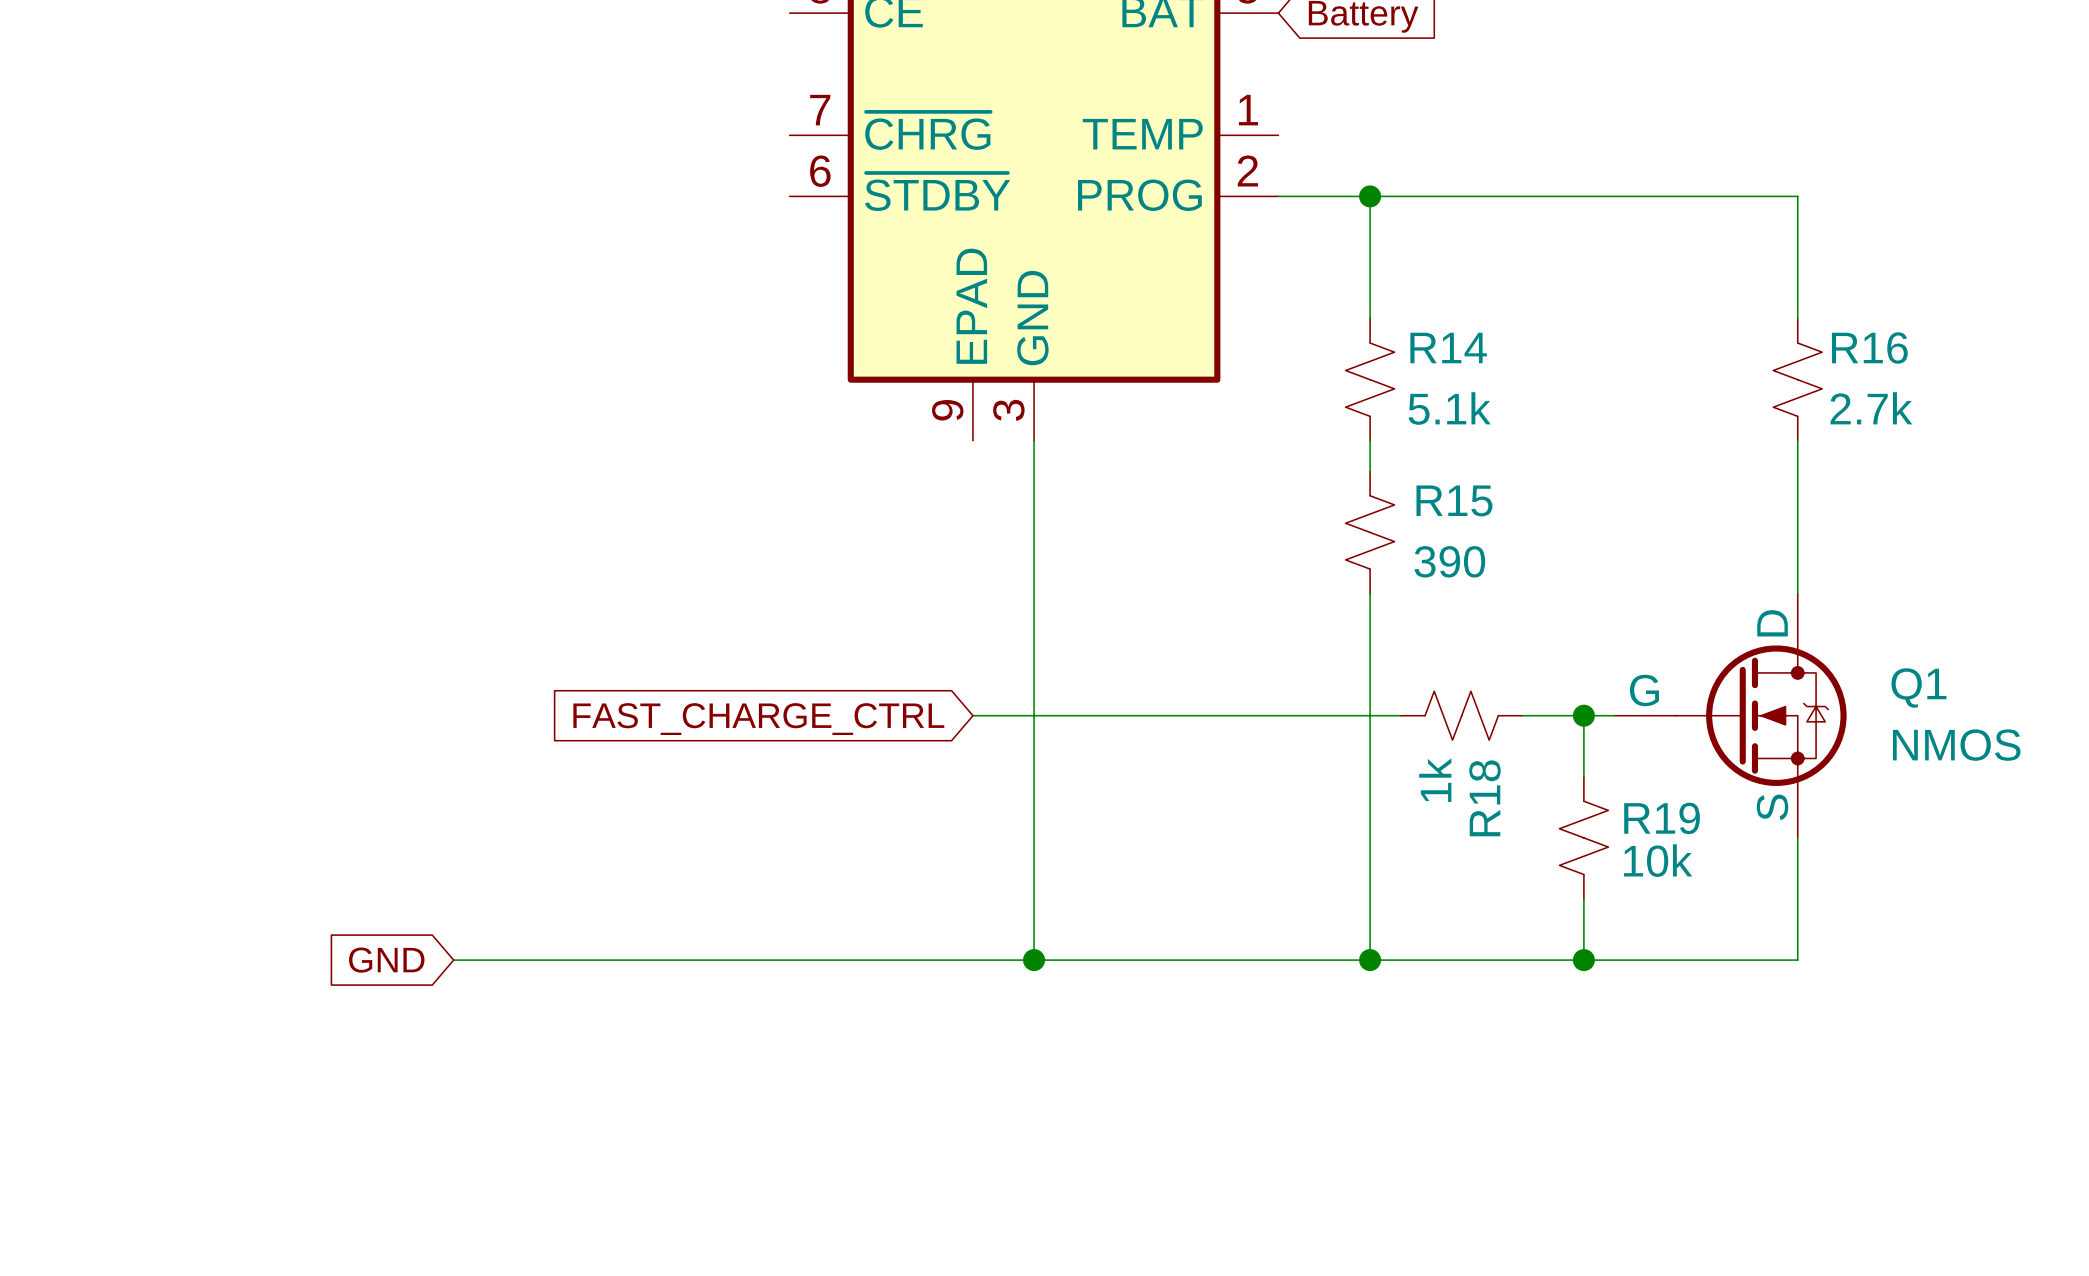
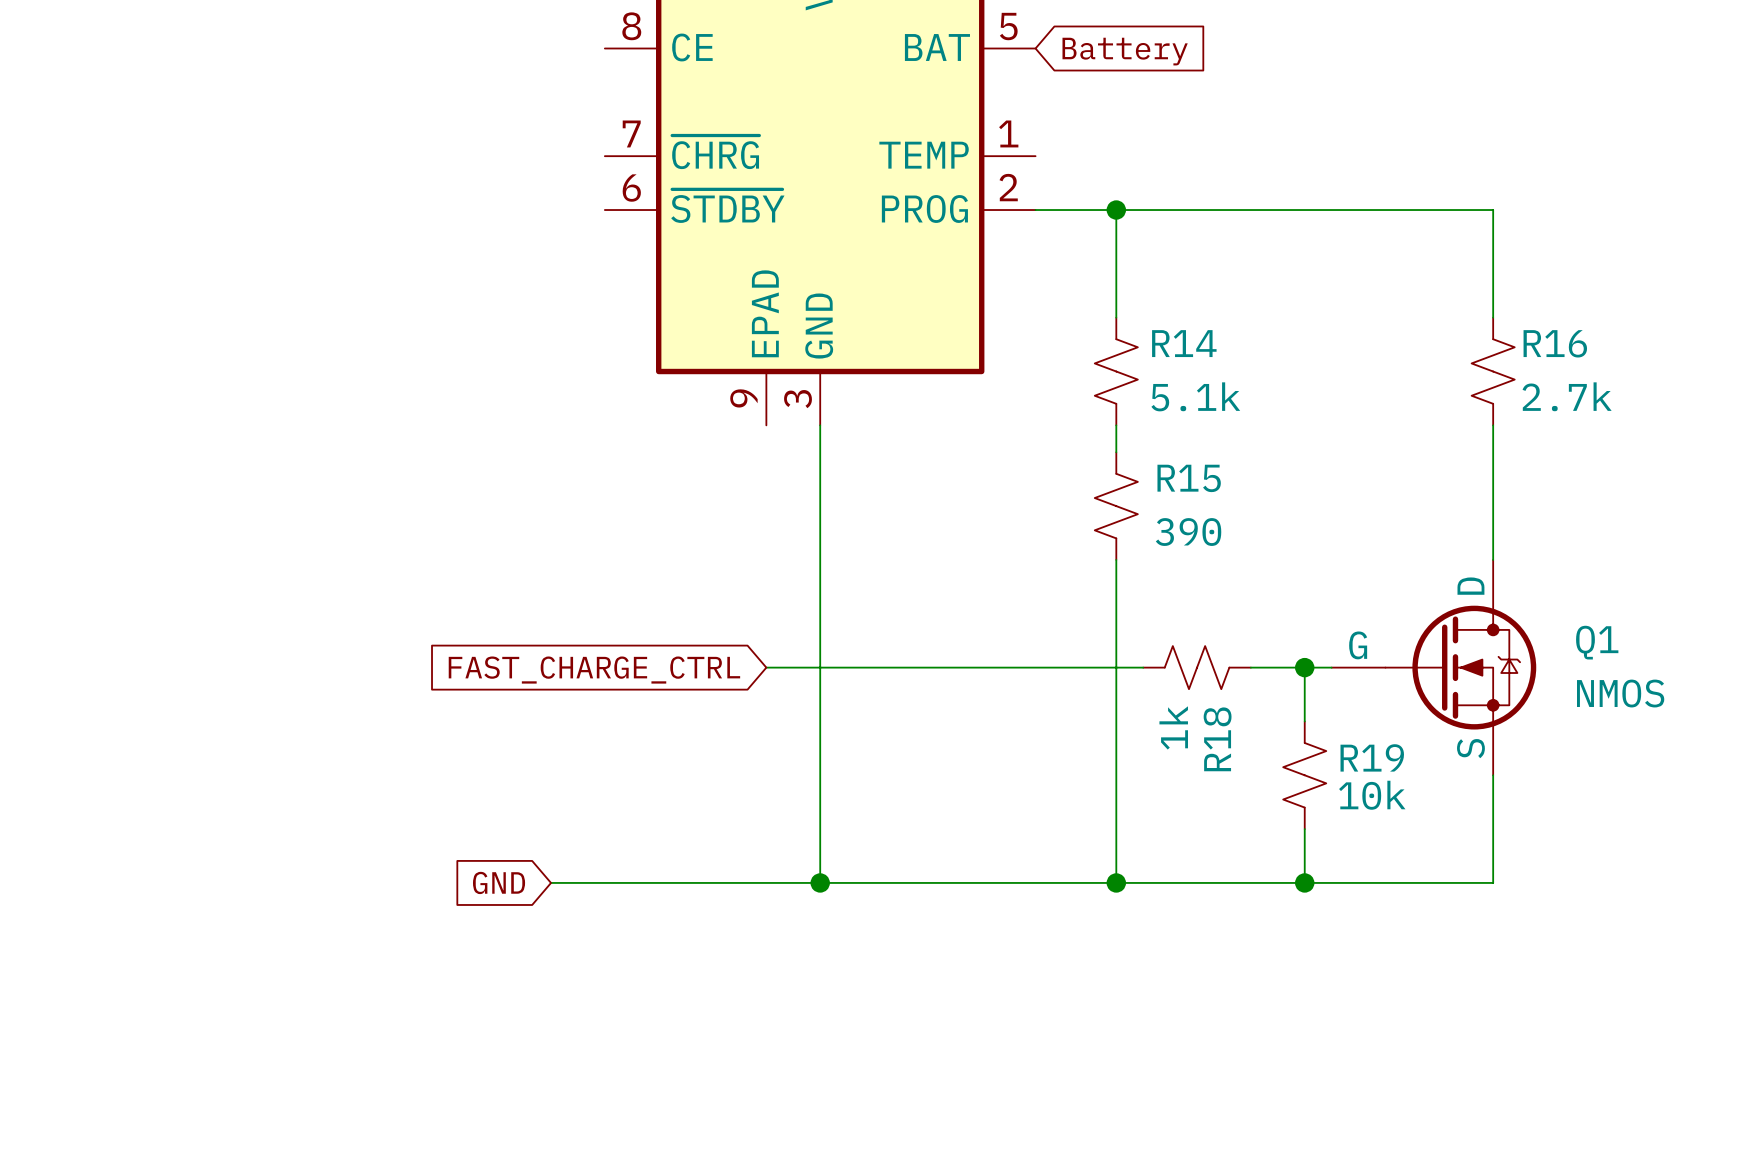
global label position: GND (386, 960) -> GND (499, 882)
wire: (453, 960) (728, 960) -> none

